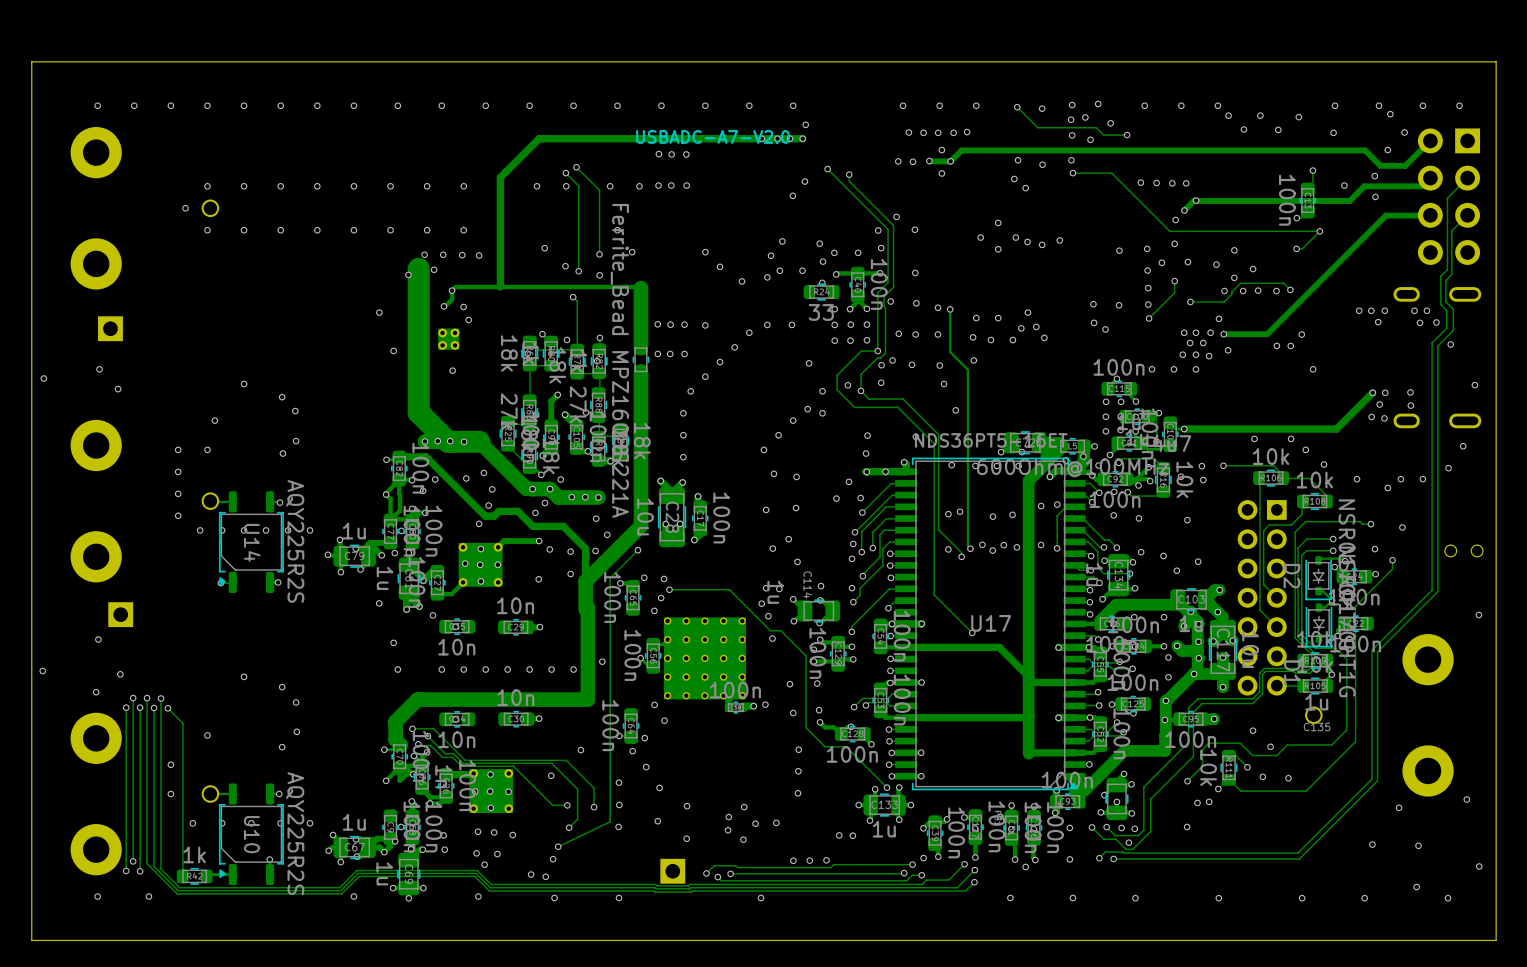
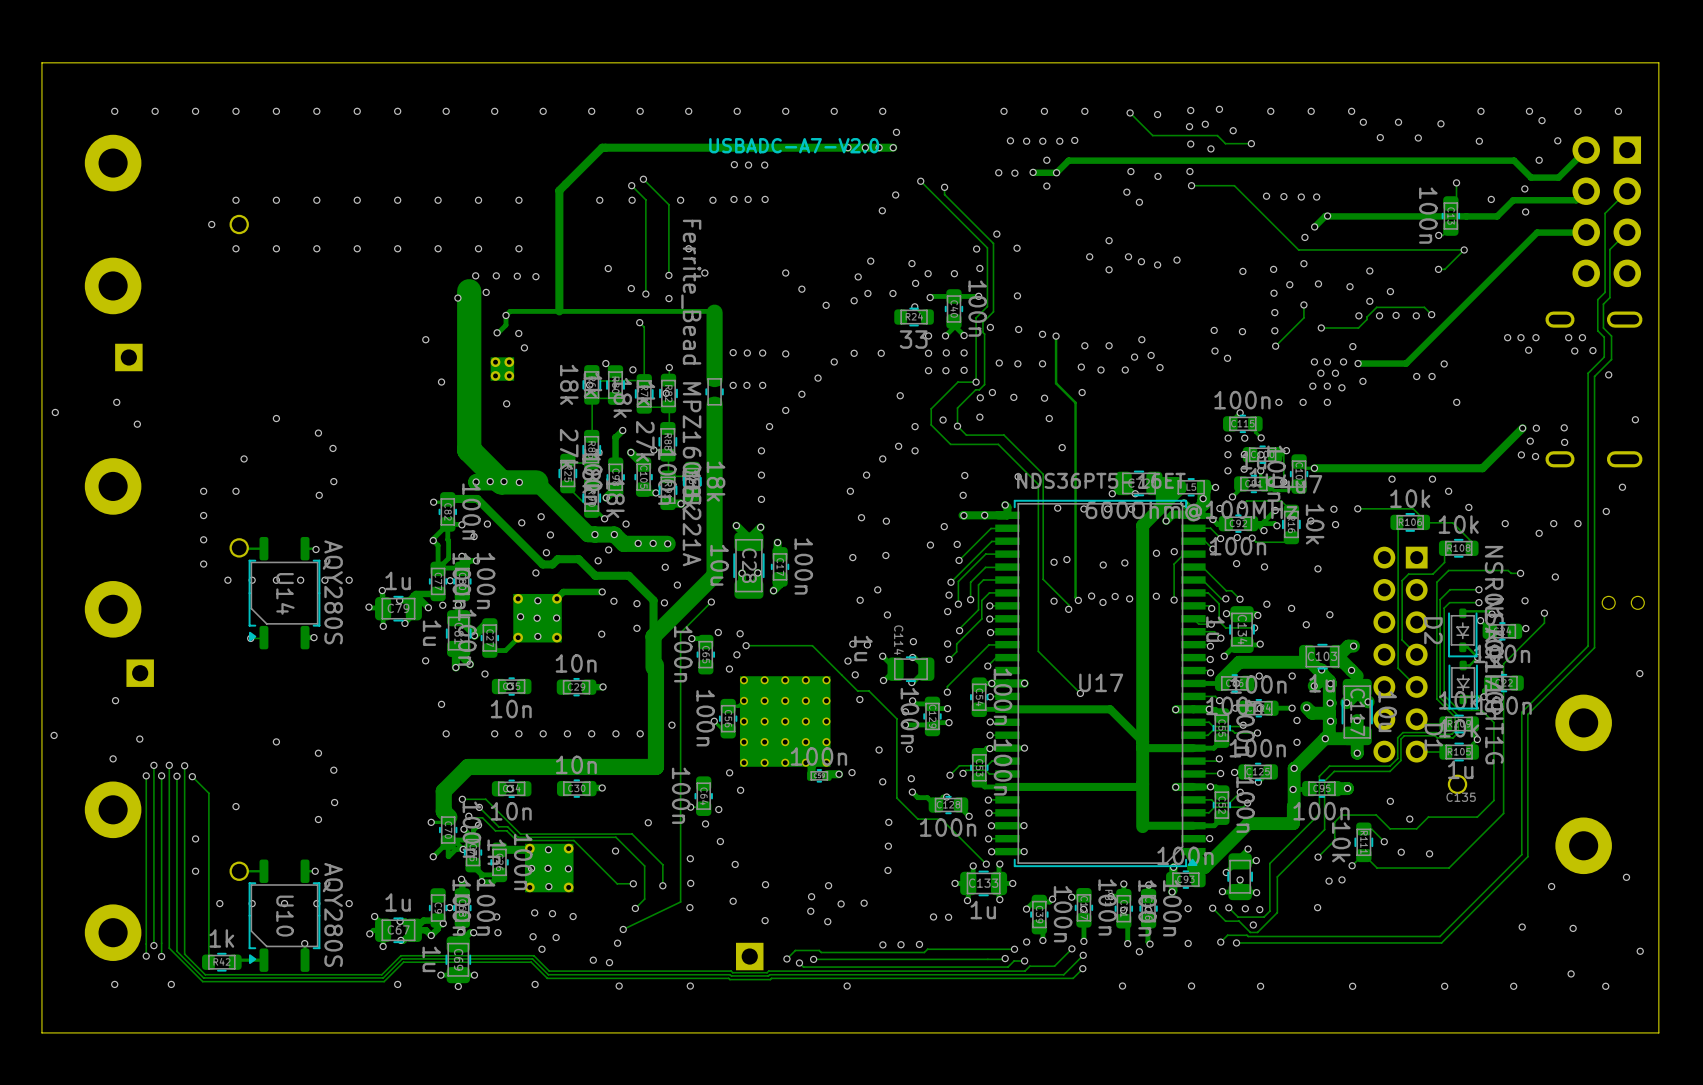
U14 value: AQY225R2S (295, 541) -> AQY280S (332, 592)
U10 value: AQY225R2S (295, 833) -> AQY280S (332, 914)

